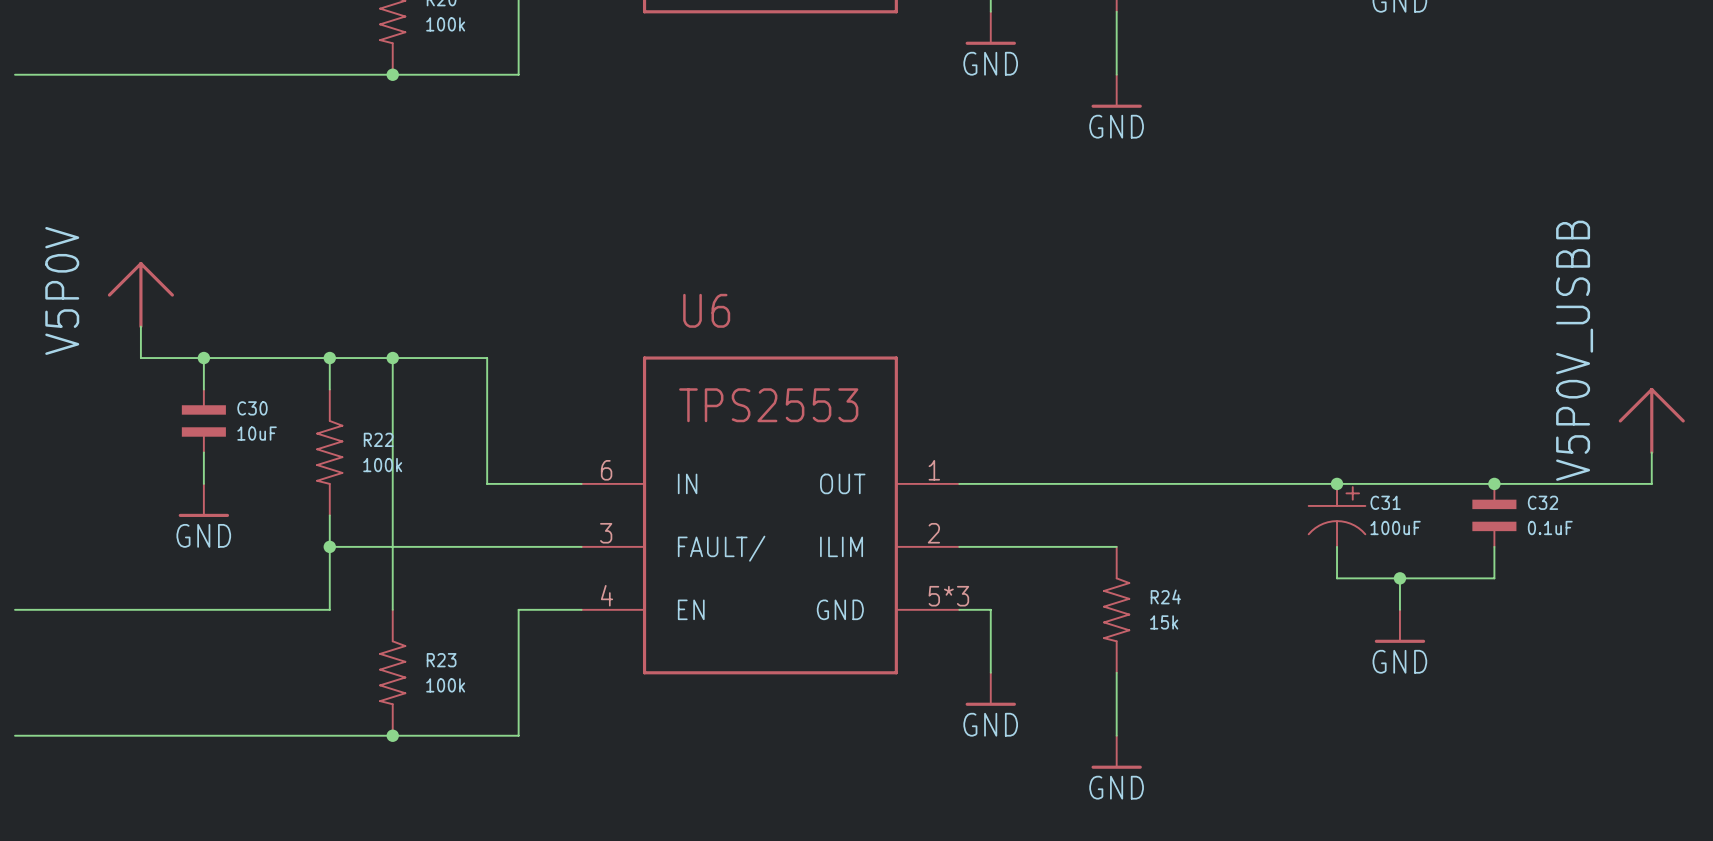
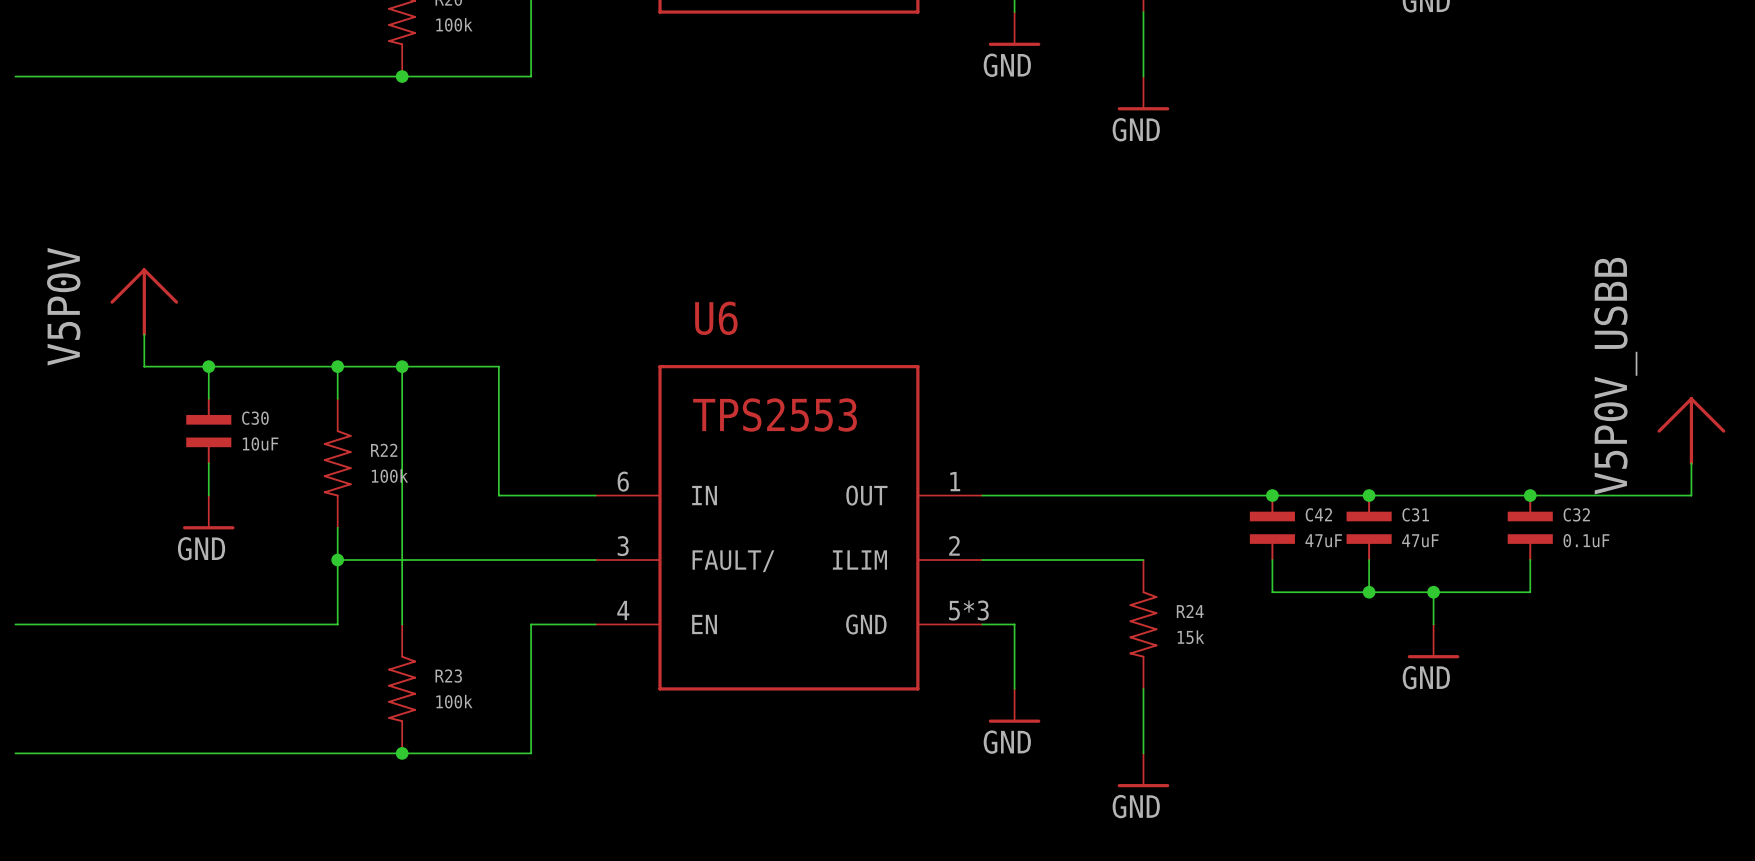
C31 symbol: [1307, 482, 1367, 548] -> [1346, 494, 1392, 561]
junction: none -> (1272, 495)
C42: none -> 47uF (1272, 527)
C31 value: 100uF (1395, 527) -> 47uF (1420, 540)
wire: none -> (1272, 560) (1272, 592) (1369, 592)
junction: none -> (1369, 592)

